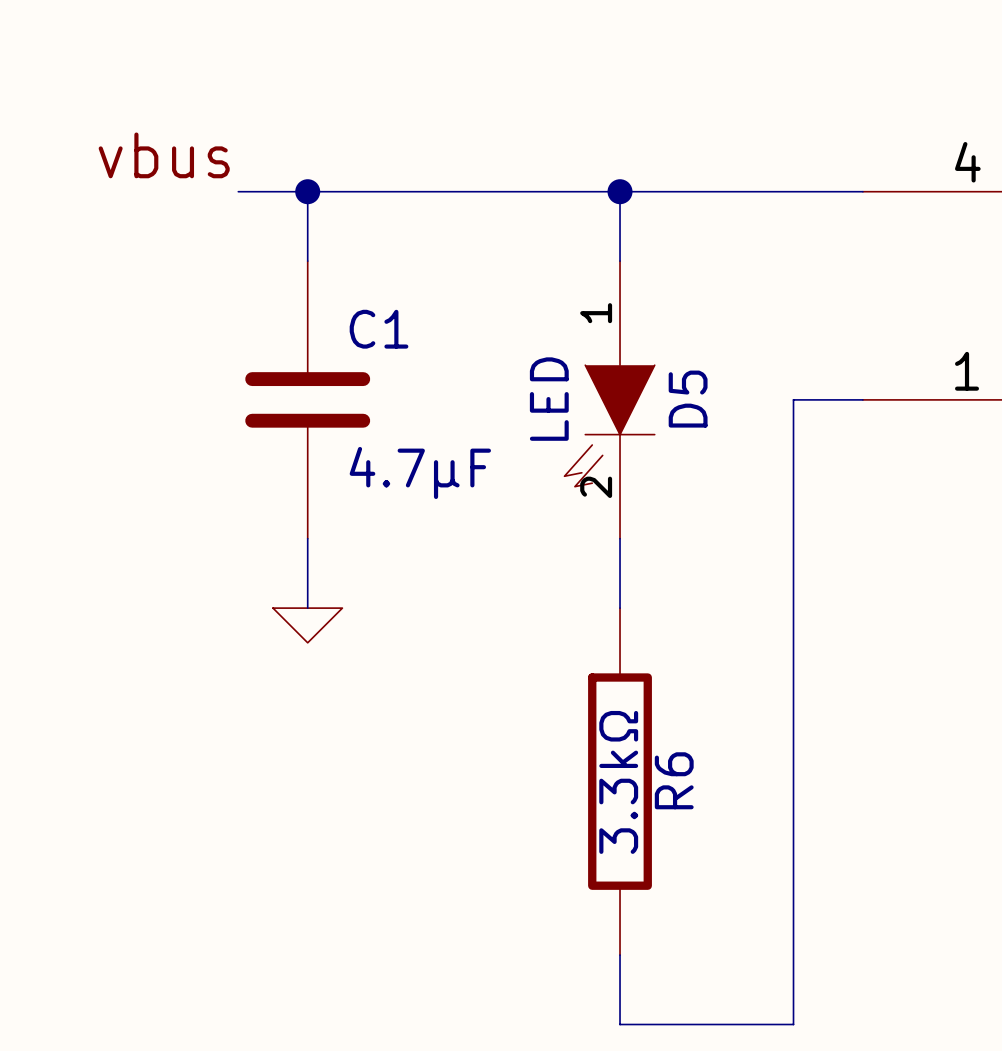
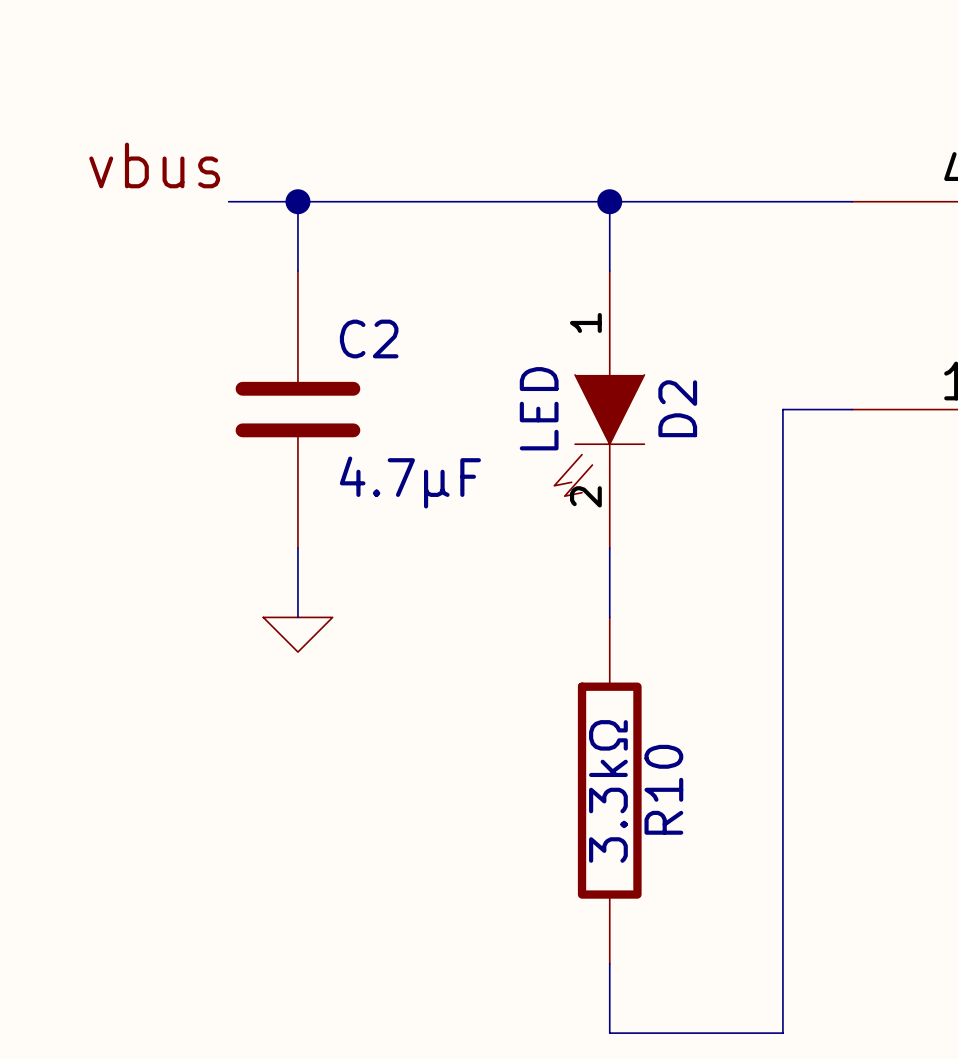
C1 name: C1 (379, 329) -> C2 (369, 338)
D5 name: D5 (688, 399) -> D2 (677, 408)
R6 name: R6 (674, 780) -> R10 (663, 789)

